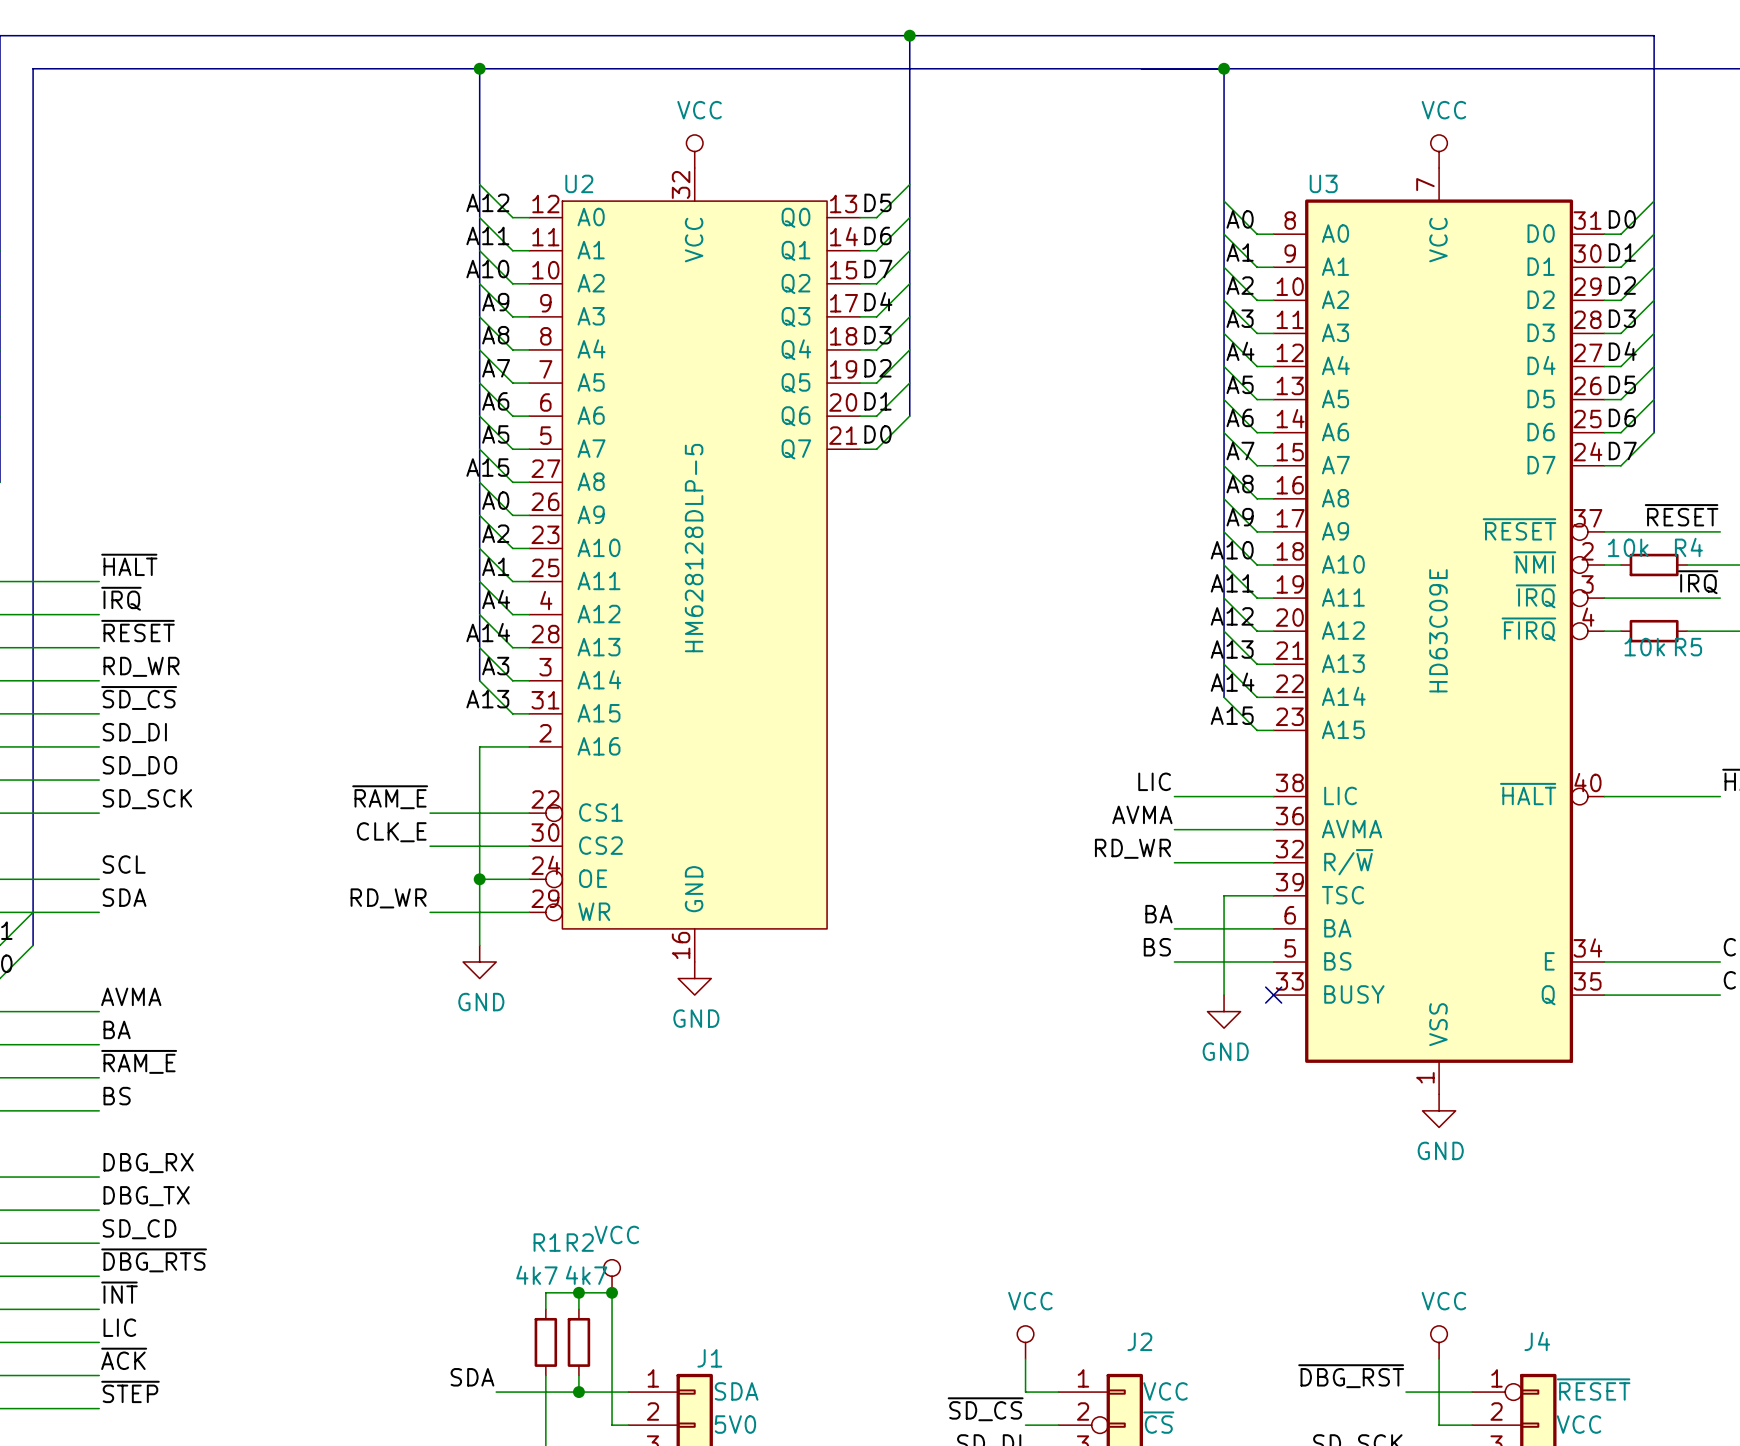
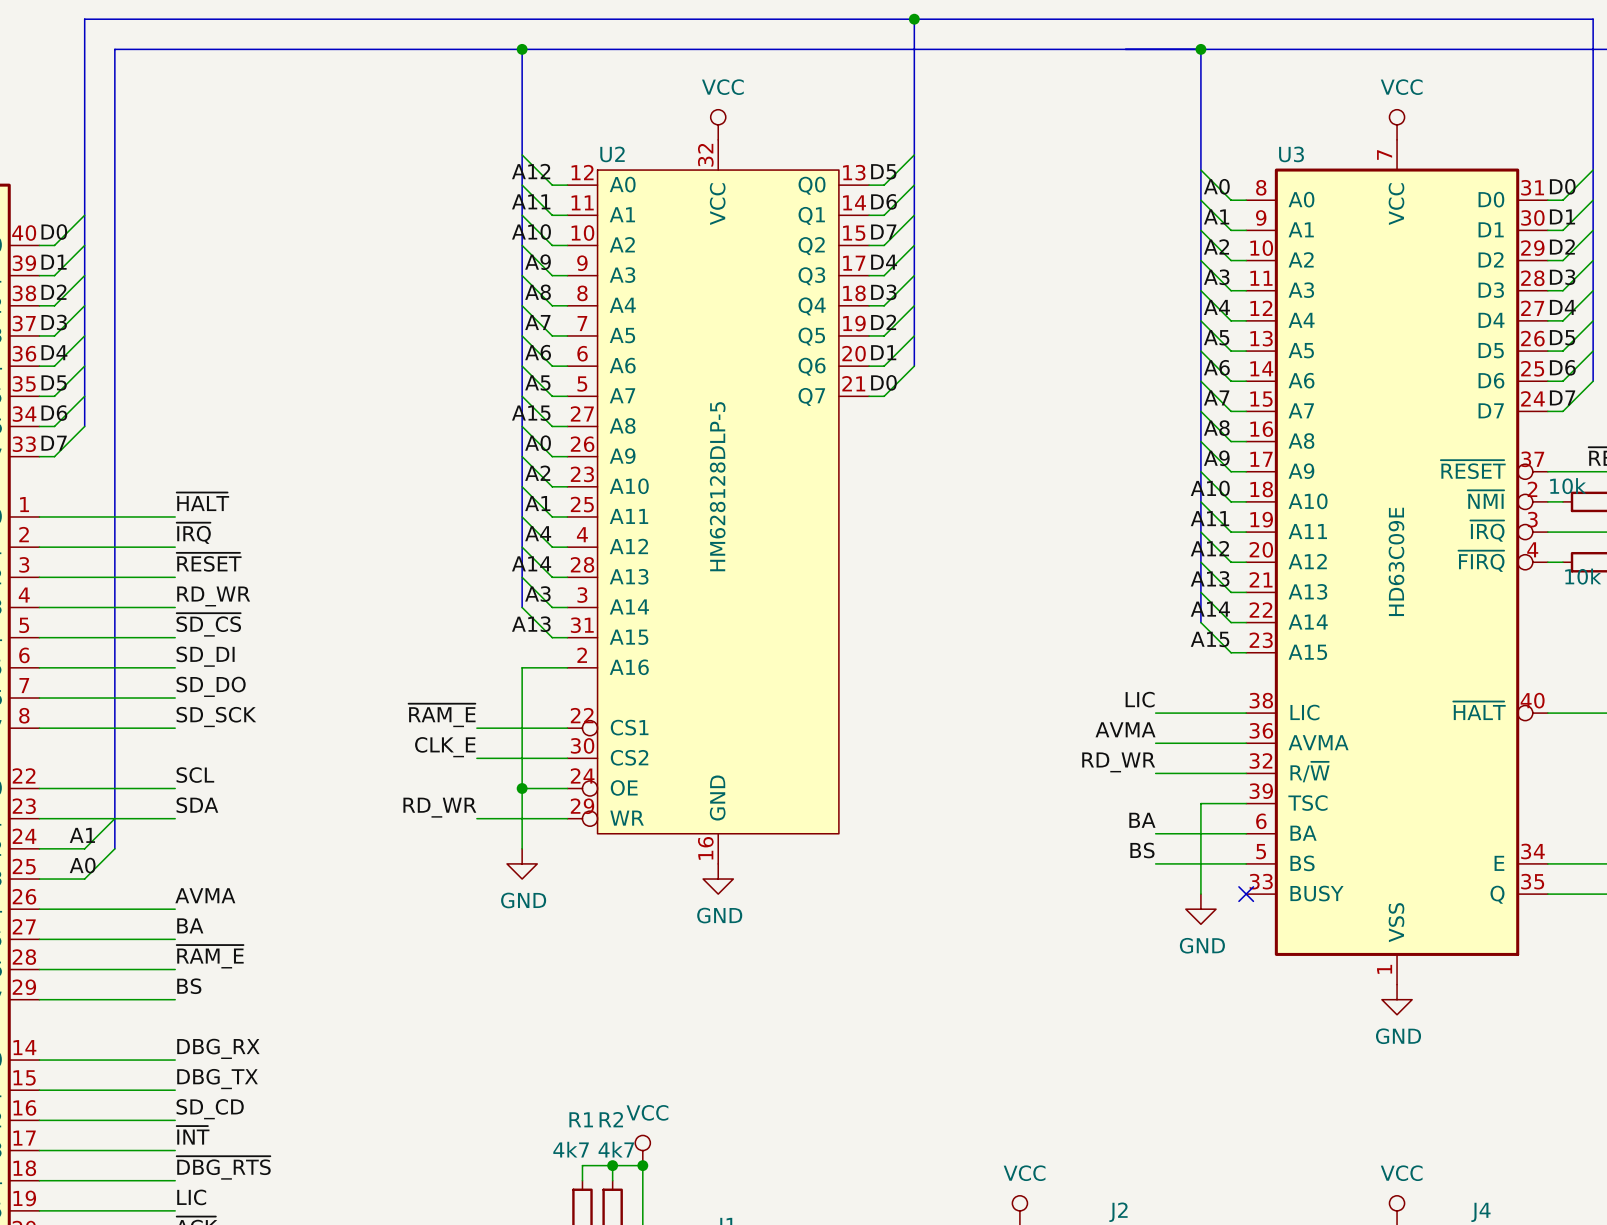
label: ~{DBG_RTS} (154, 1260) -> ~{INT} (193, 1135)
label: ~{INT} (119, 1292) -> ~{DBG_RTS} (223, 1167)

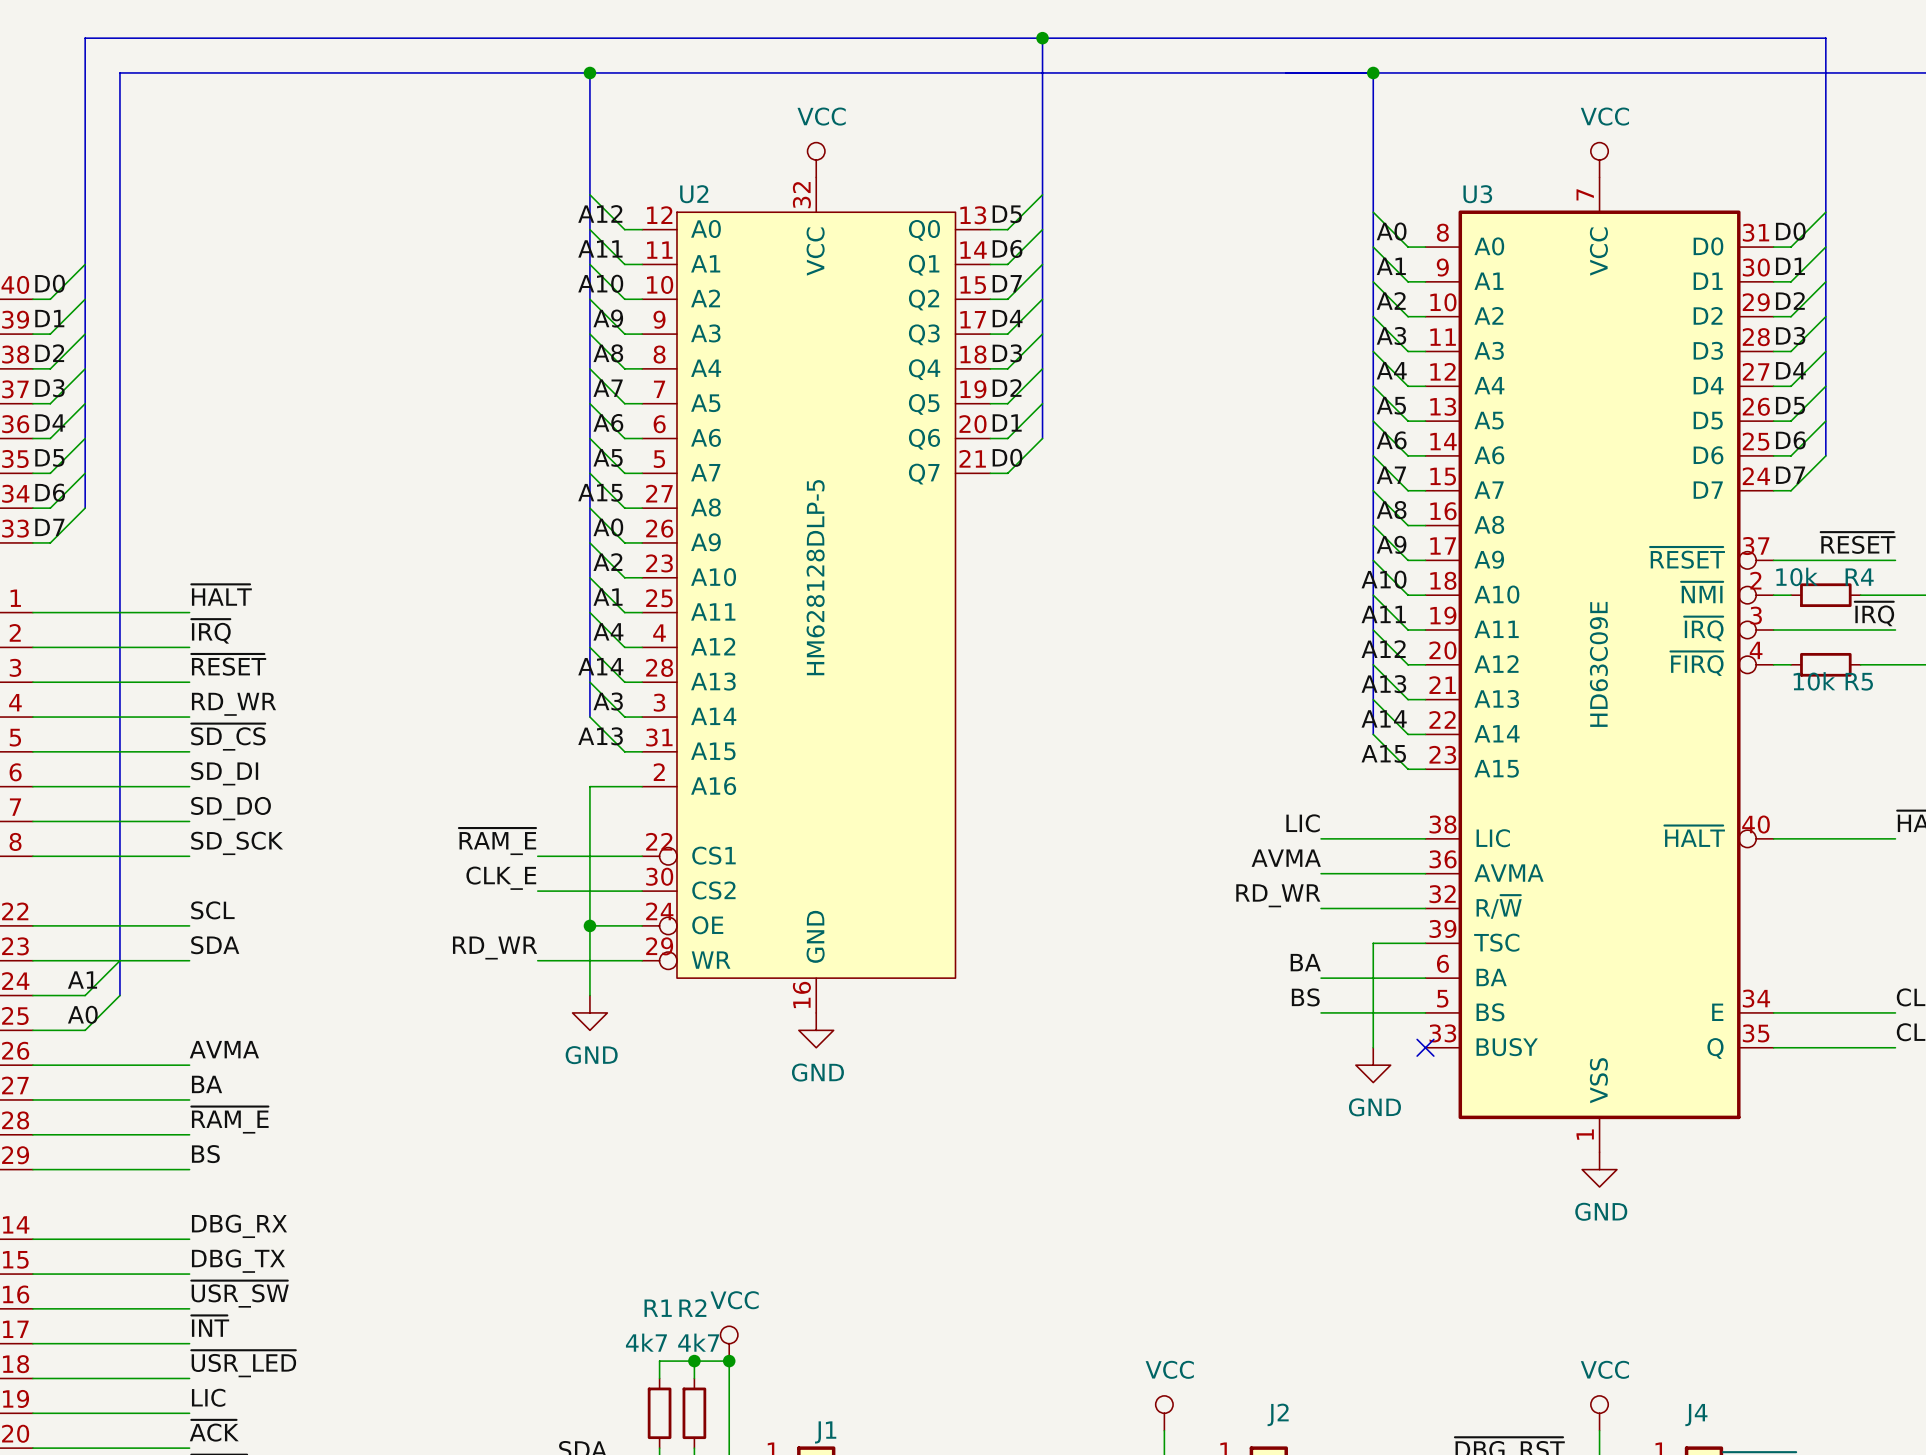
label: SD_CD (210, 1109) -> ~{USR_SW} (240, 1294)
label: ~{DBG_RTS} (223, 1167) -> ~{USR_LED} (243, 1363)

